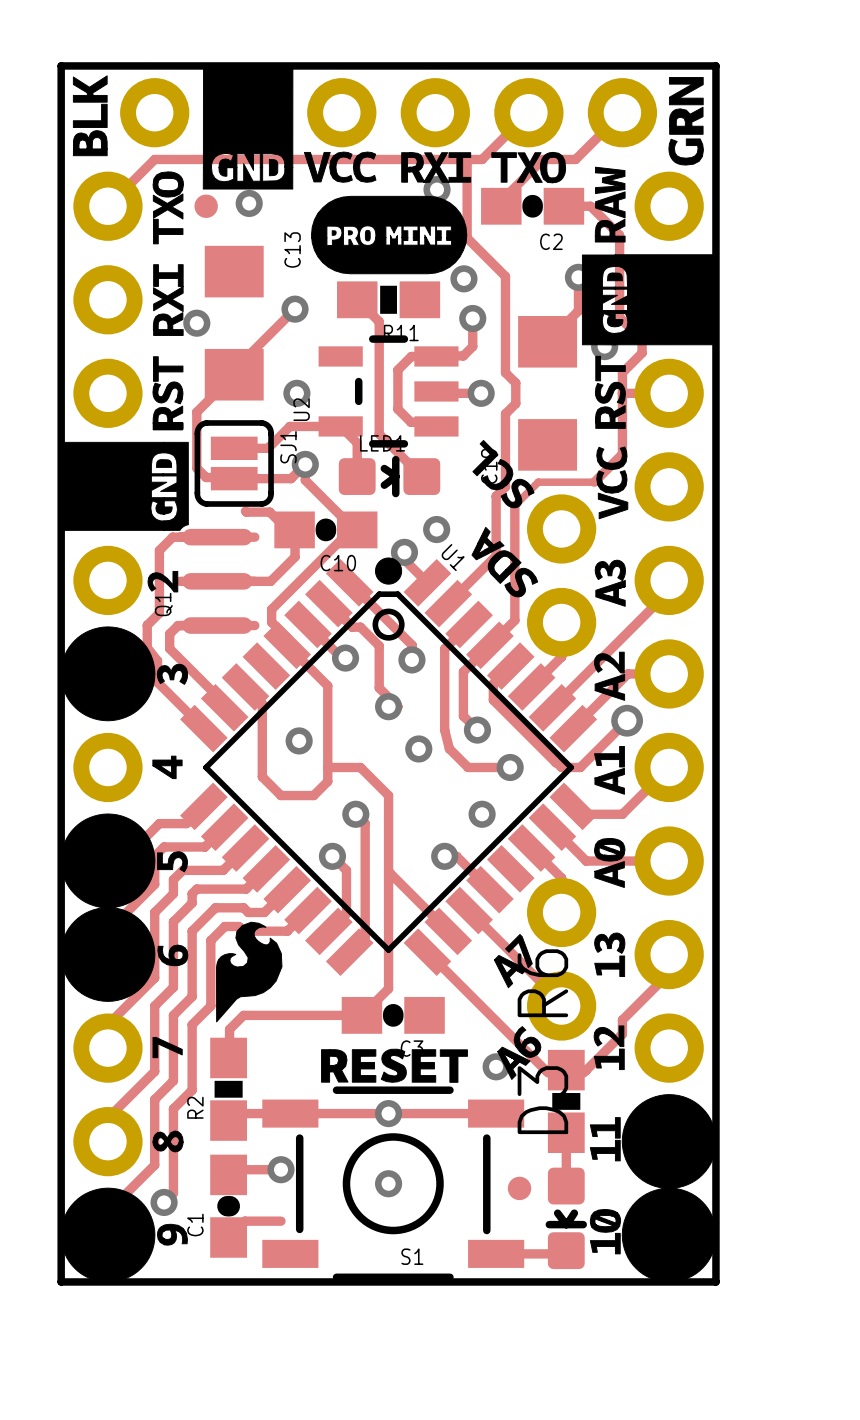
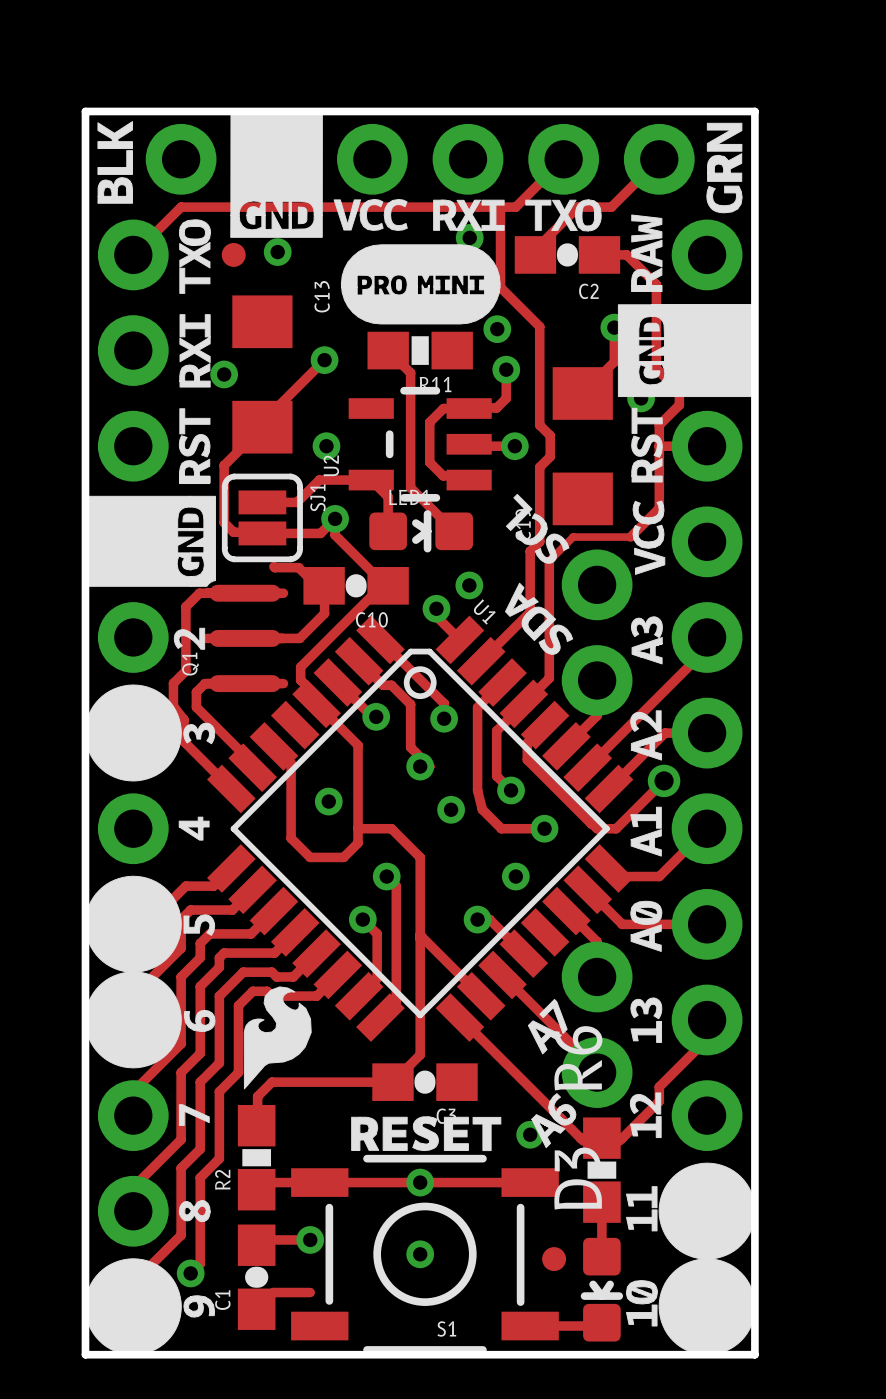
drawing: [375, 557, 403, 585] -> none

